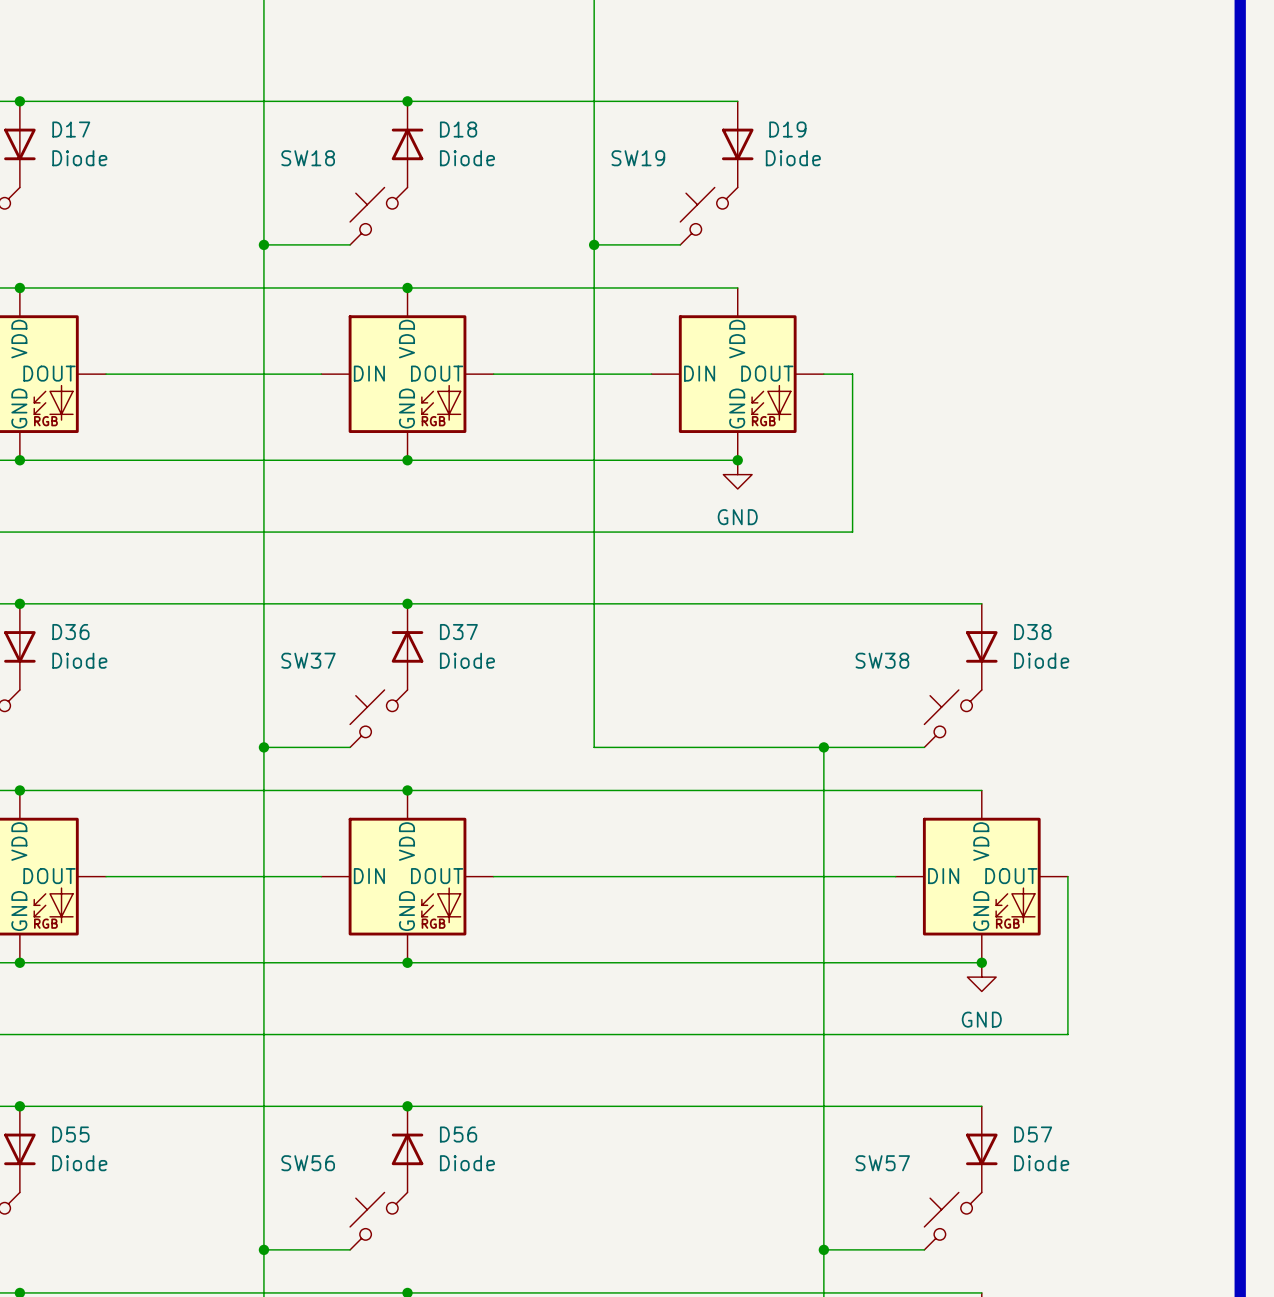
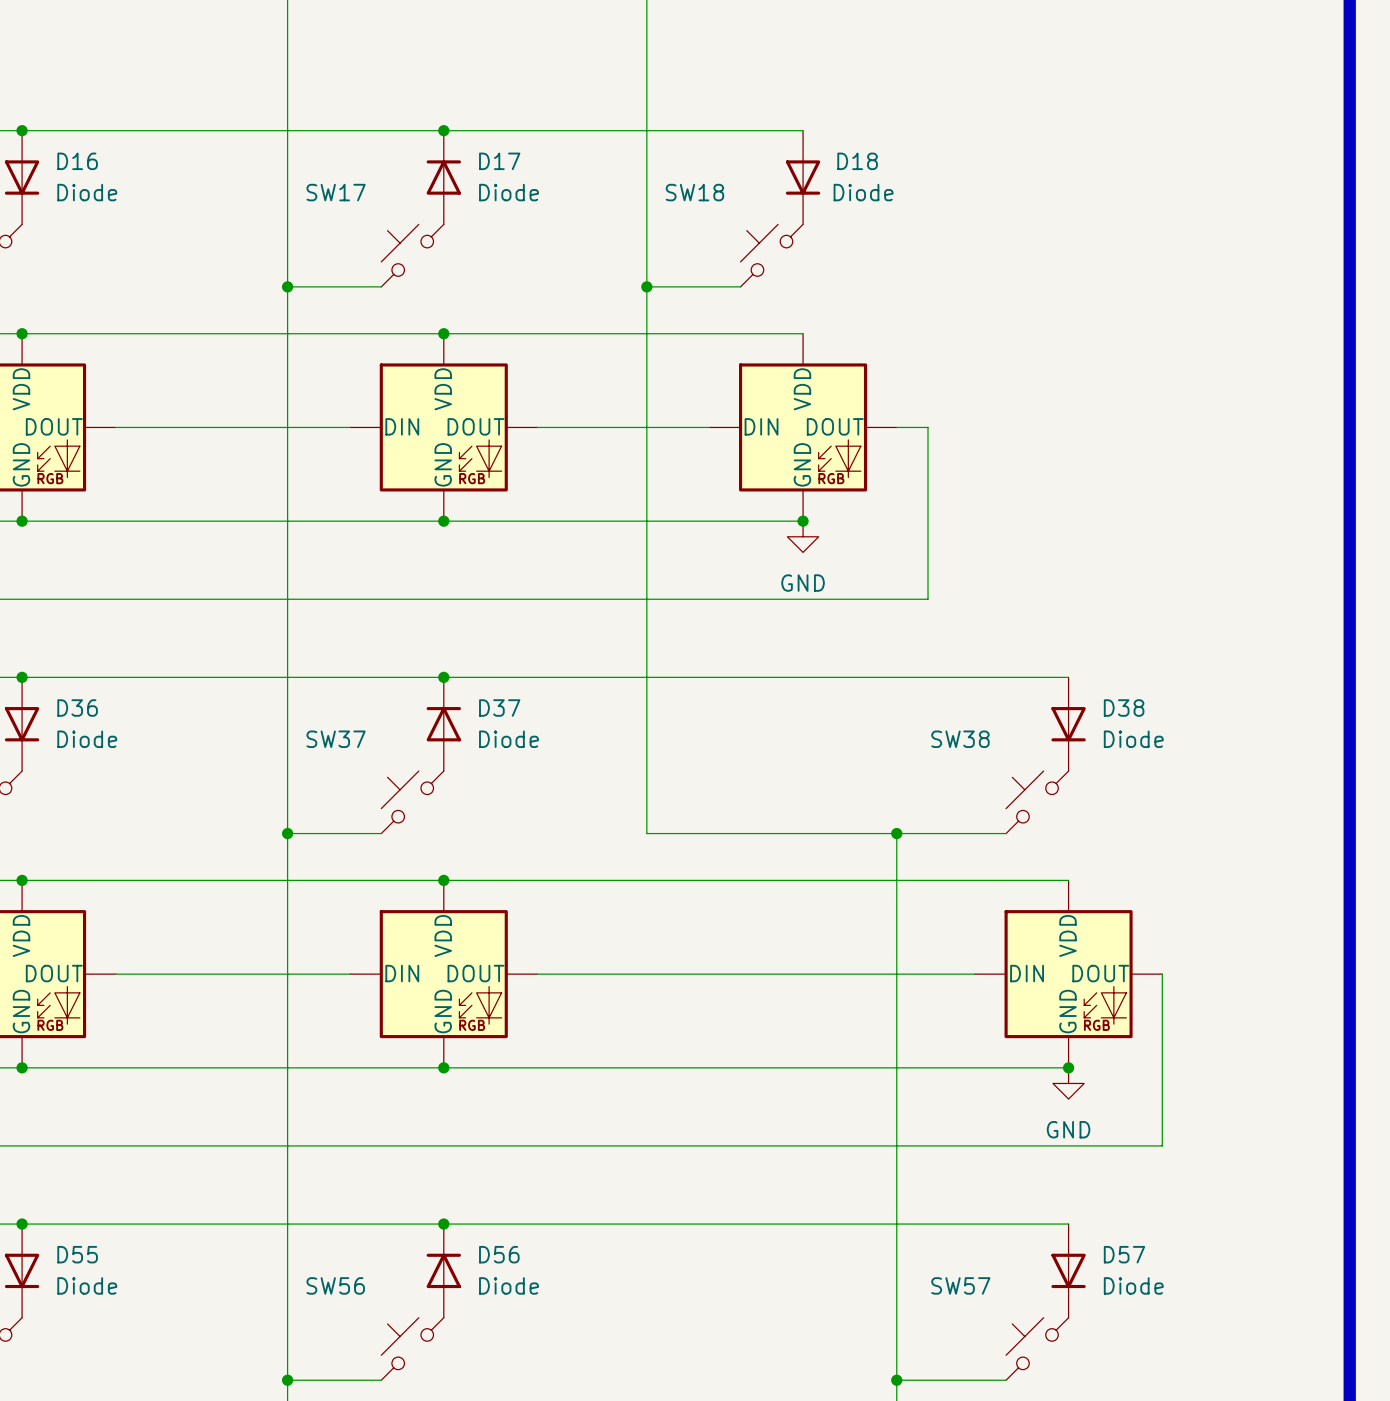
D17 name: D17 (71, 129) -> D16 (77, 161)
D18 name: D18 (458, 129) -> D17 (499, 161)
D19 name: D19 (787, 129) -> D18 (857, 161)
SW18 name: SW18 (308, 158) -> SW17 (336, 192)
SW19 name: SW19 (638, 158) -> SW18 (694, 192)

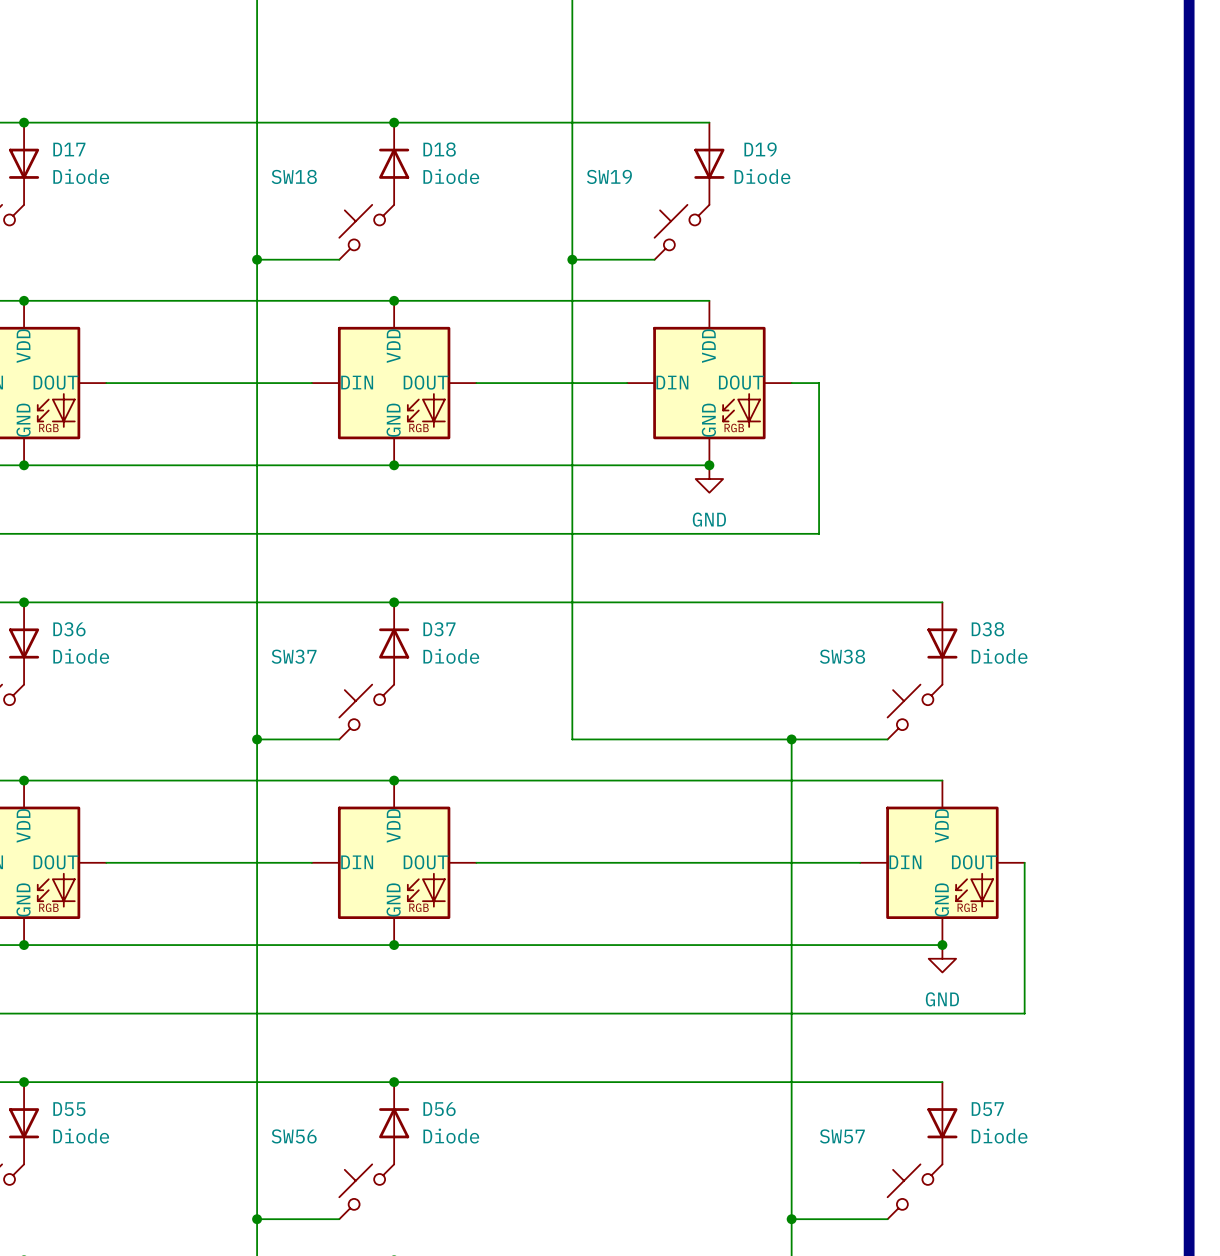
D16 name: D16 (77, 161) -> D17 (69, 149)
D17 name: D17 (499, 161) -> D18 (439, 149)
D18 name: D18 (857, 161) -> D19 (760, 149)
SW17 name: SW17 (336, 192) -> SW18 (294, 176)
SW18 name: SW18 (694, 192) -> SW19 (609, 176)

